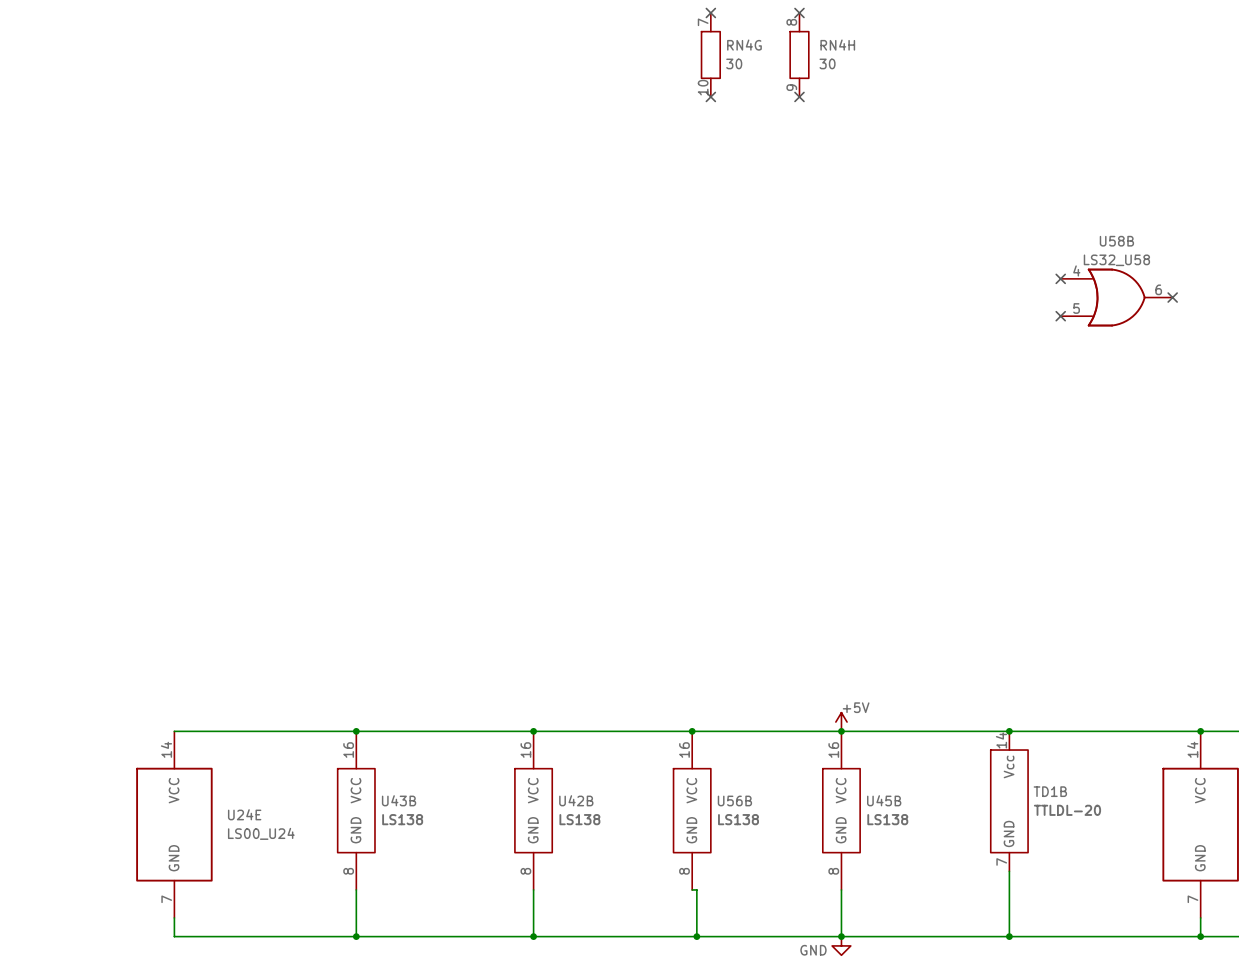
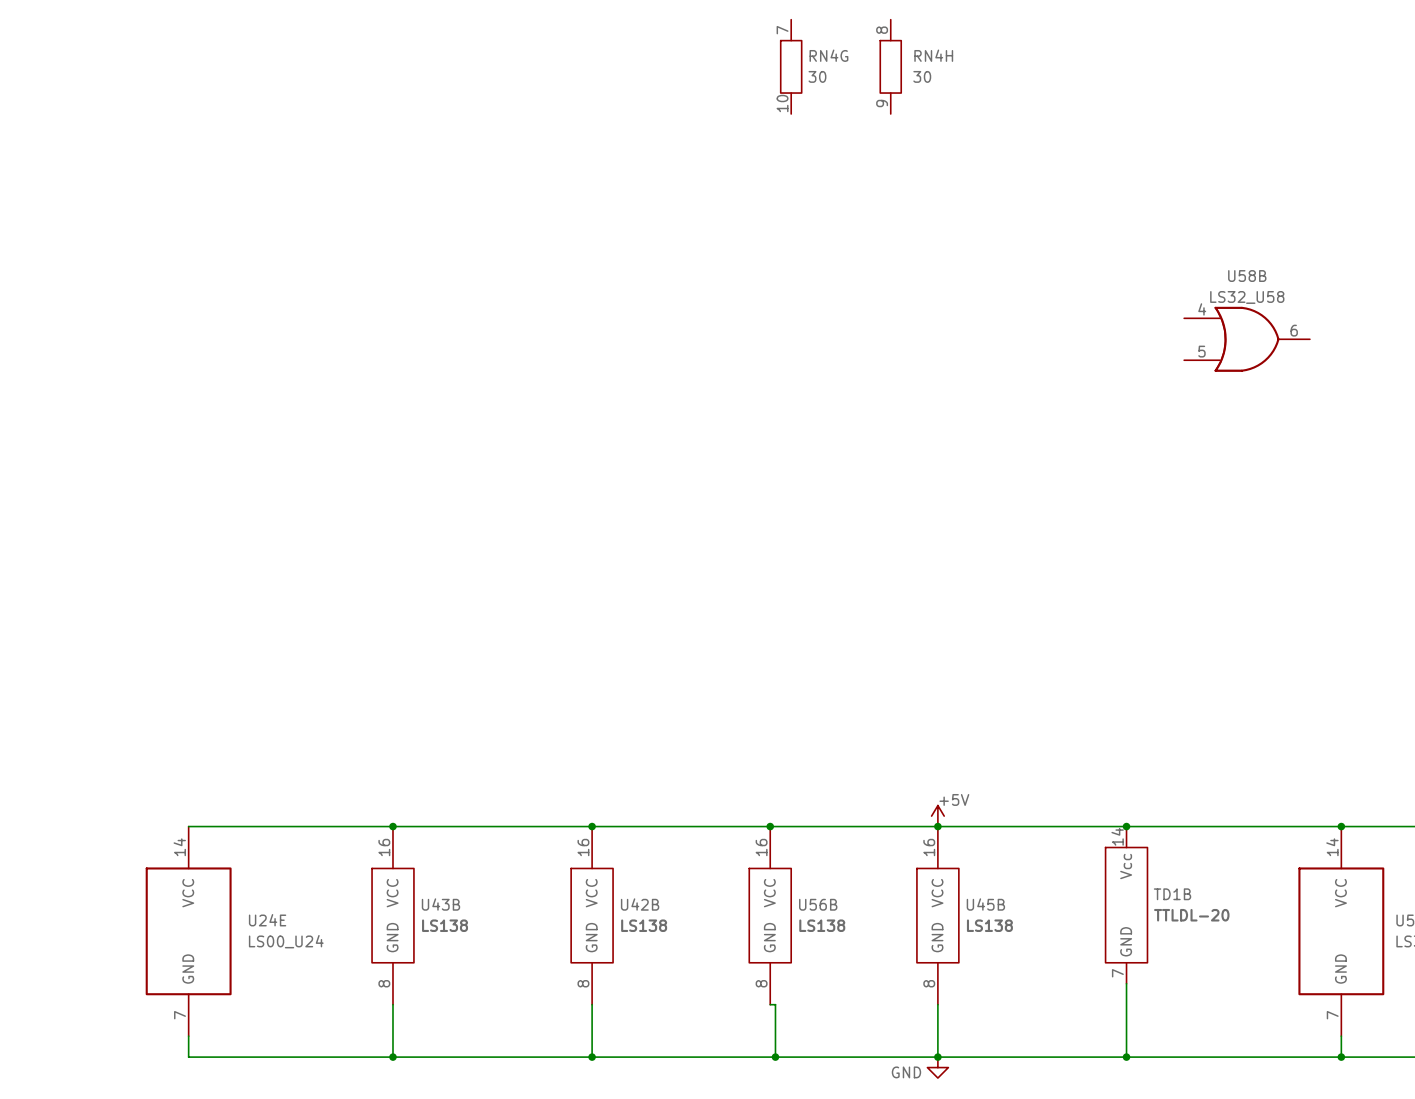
no-connect mark: (710, 12) -> none
no-connect mark: (799, 12) -> none
no-connect mark: (710, 96) -> none
no-connect mark: (799, 96) -> none
no-connect mark: (1060, 278) -> none
no-connect mark: (1172, 297) -> none
no-connect mark: (1060, 316) -> none

